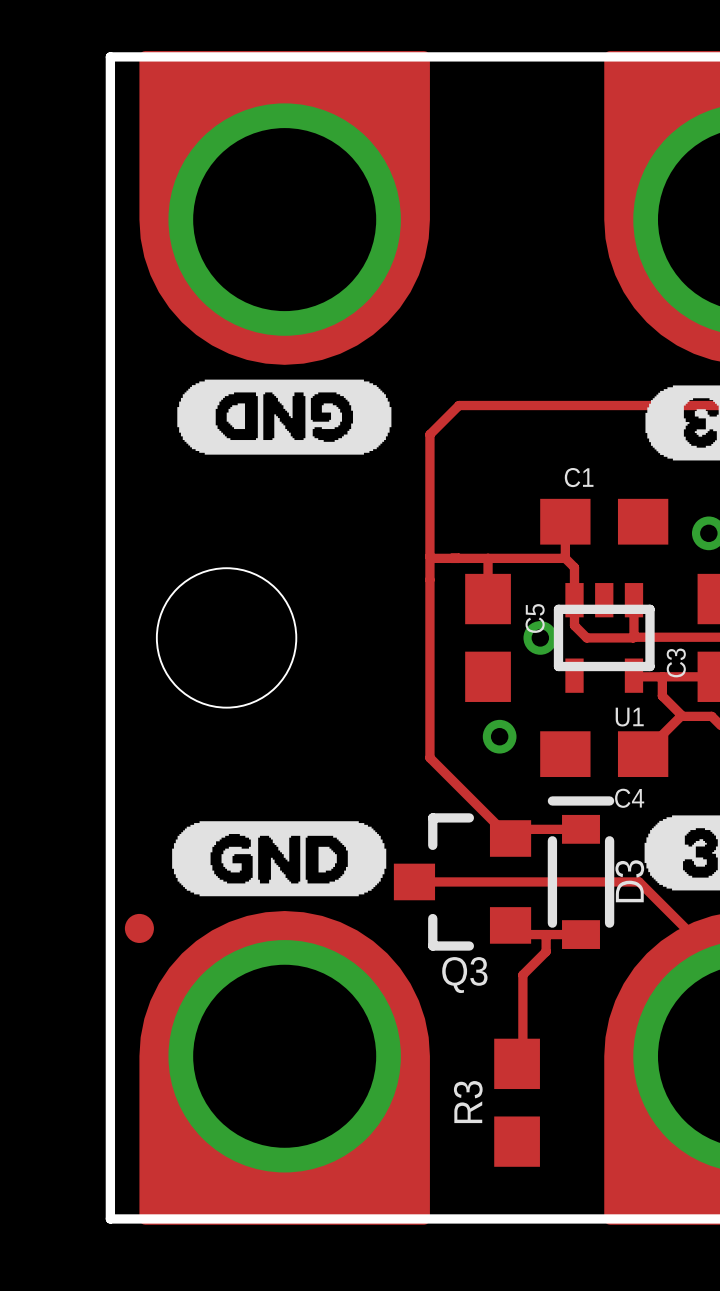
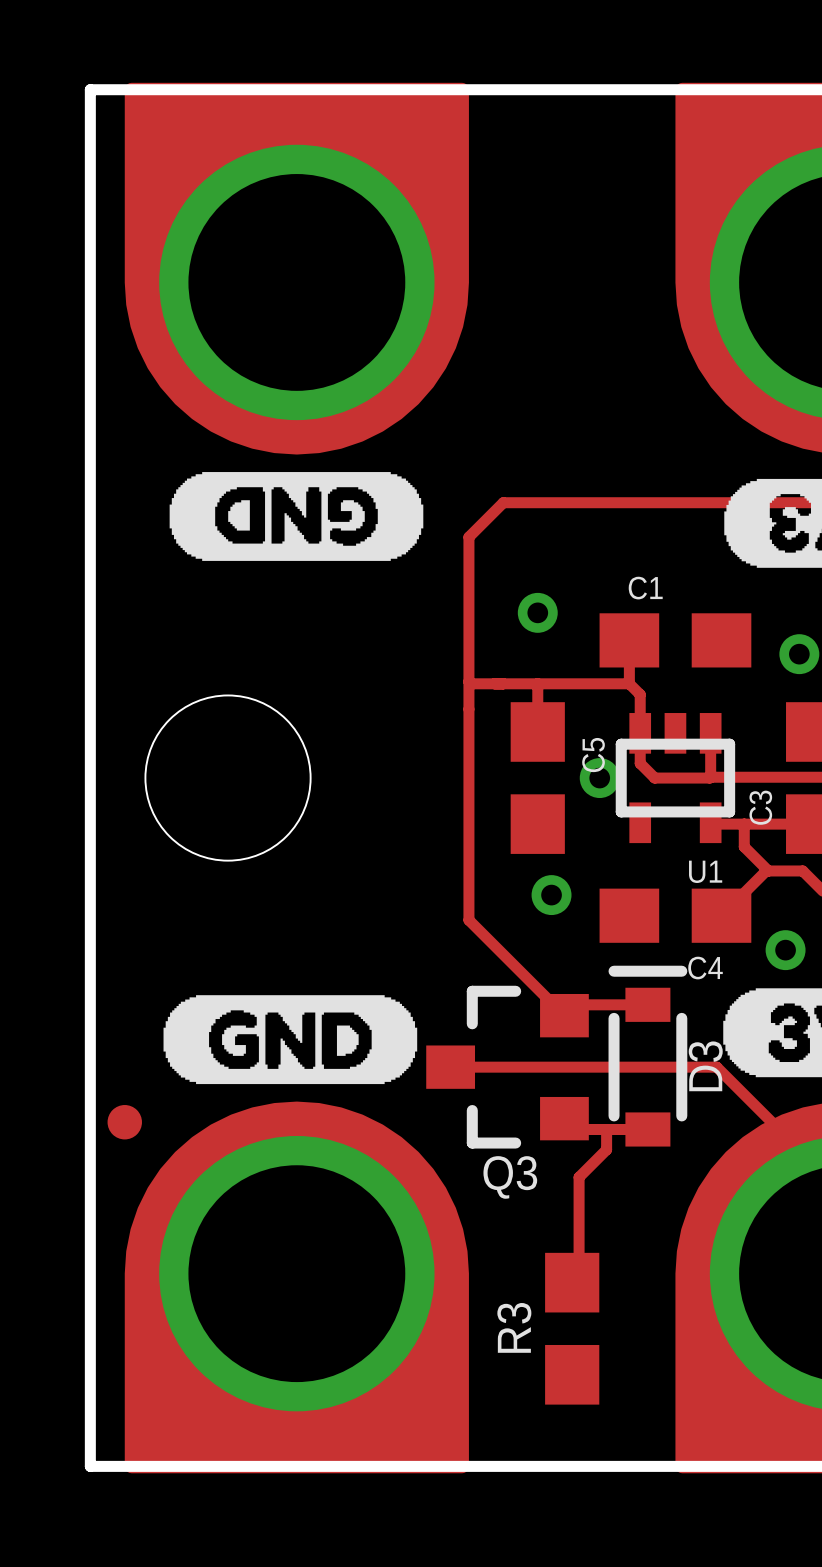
via: none -> (537, 612)
via: none -> (785, 950)

